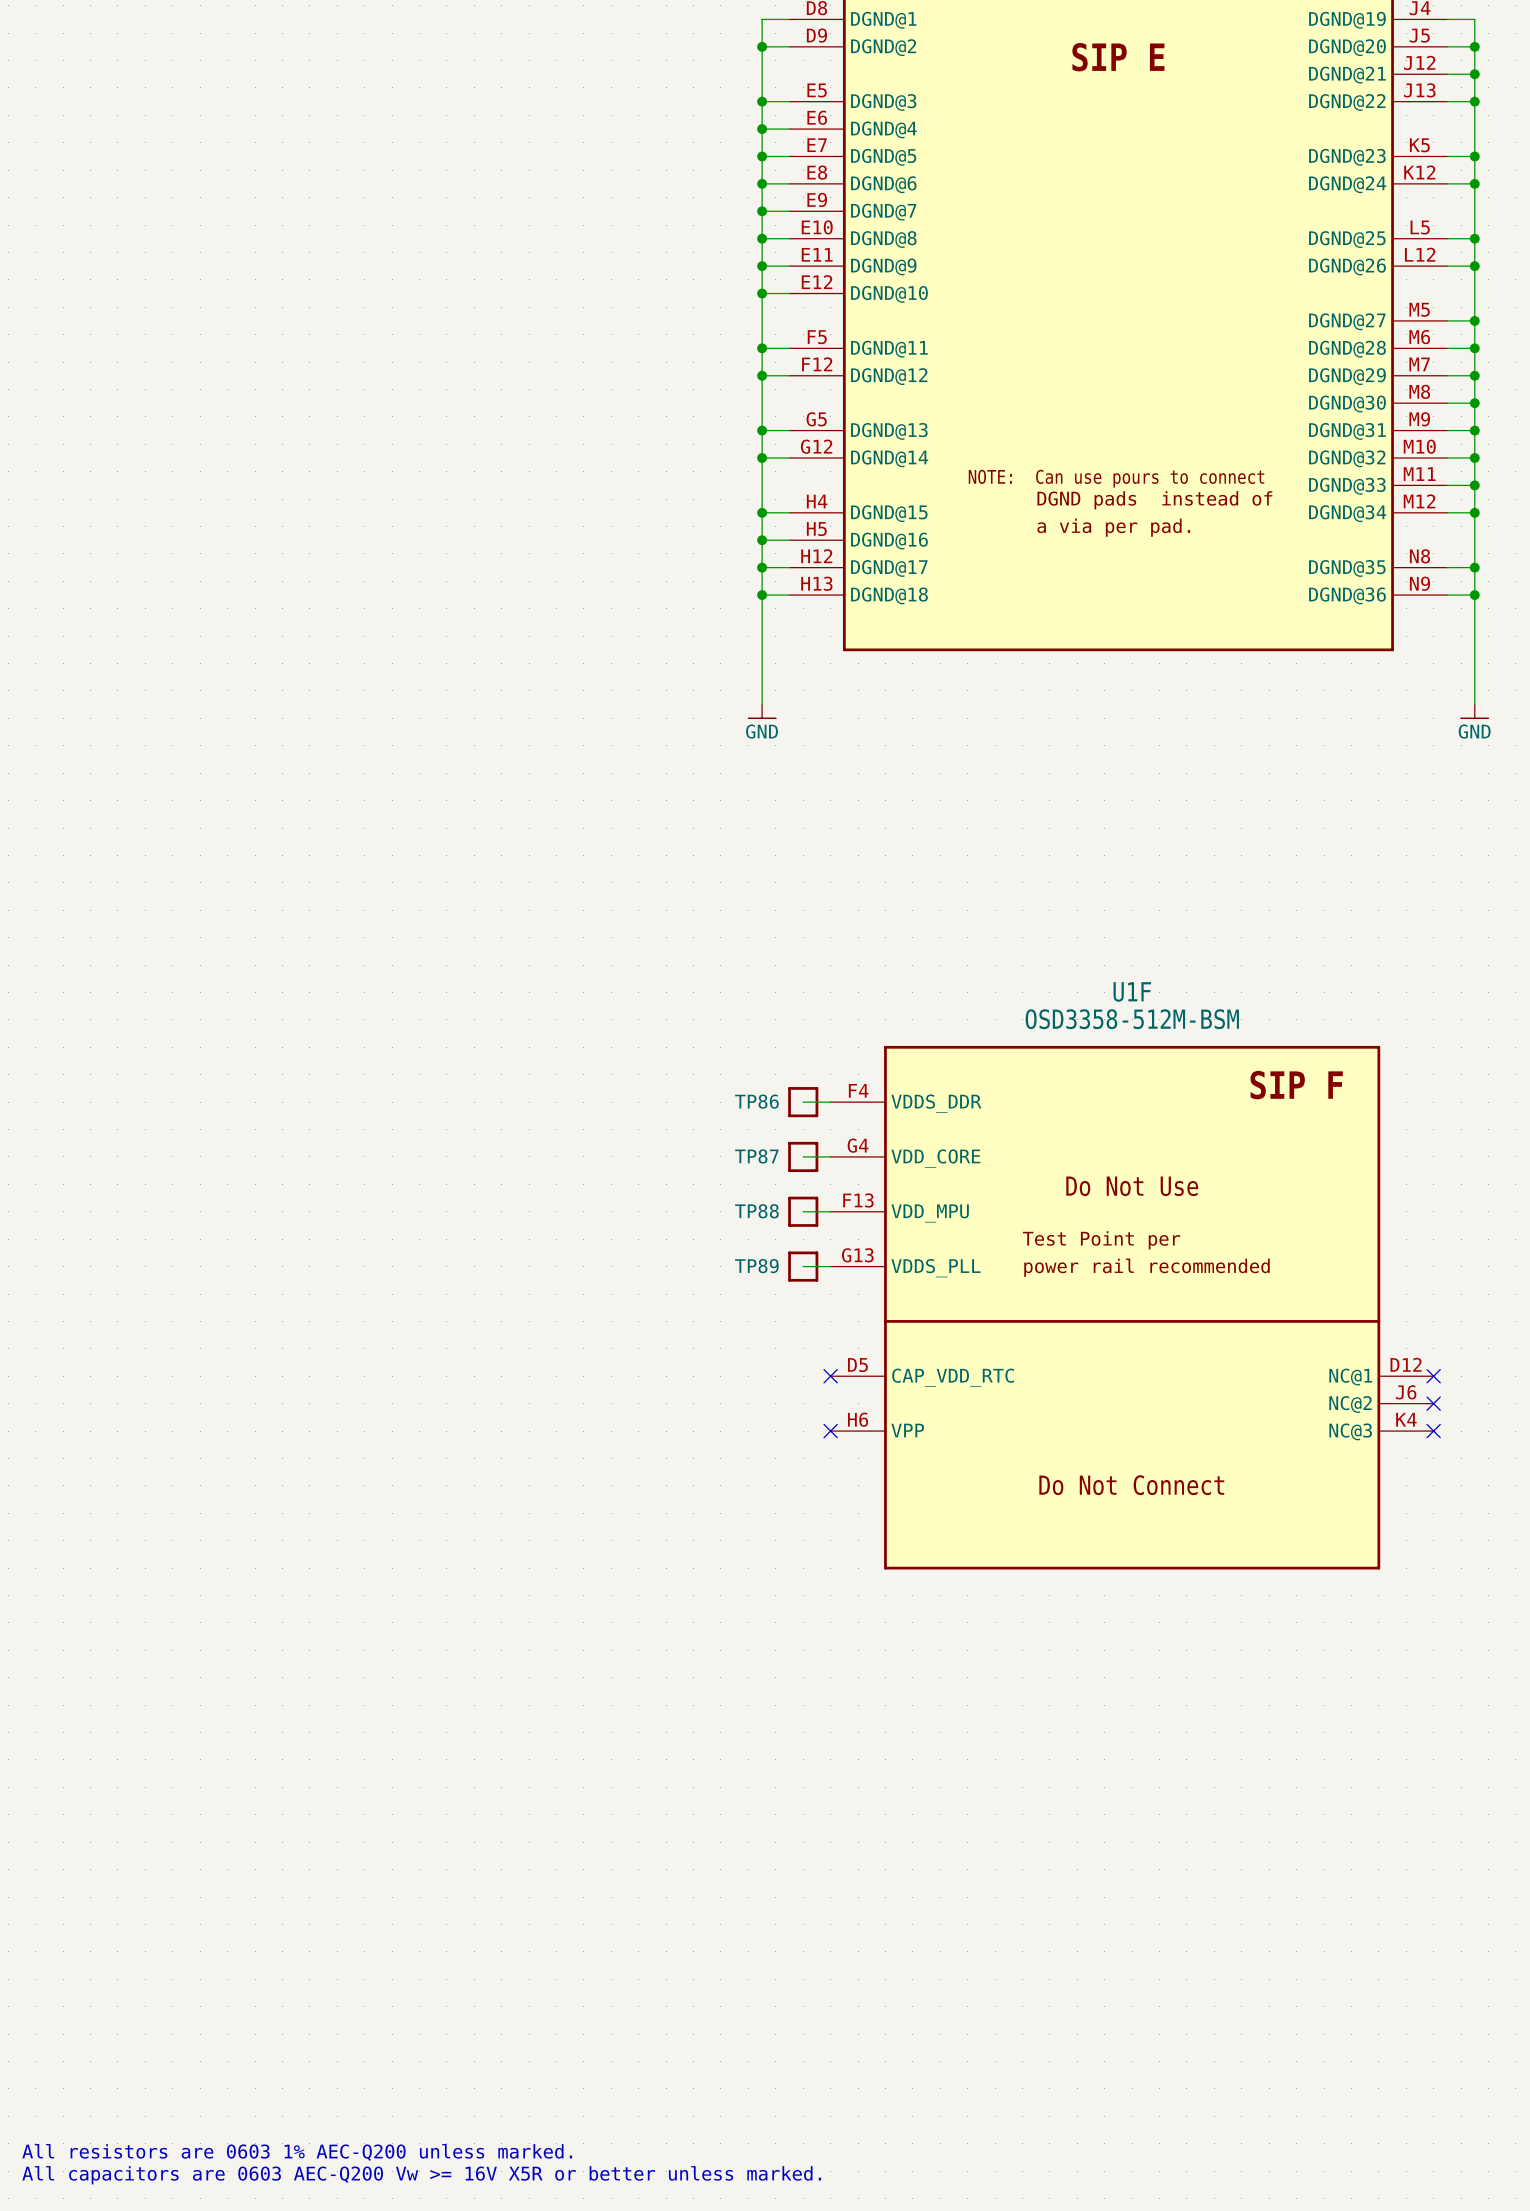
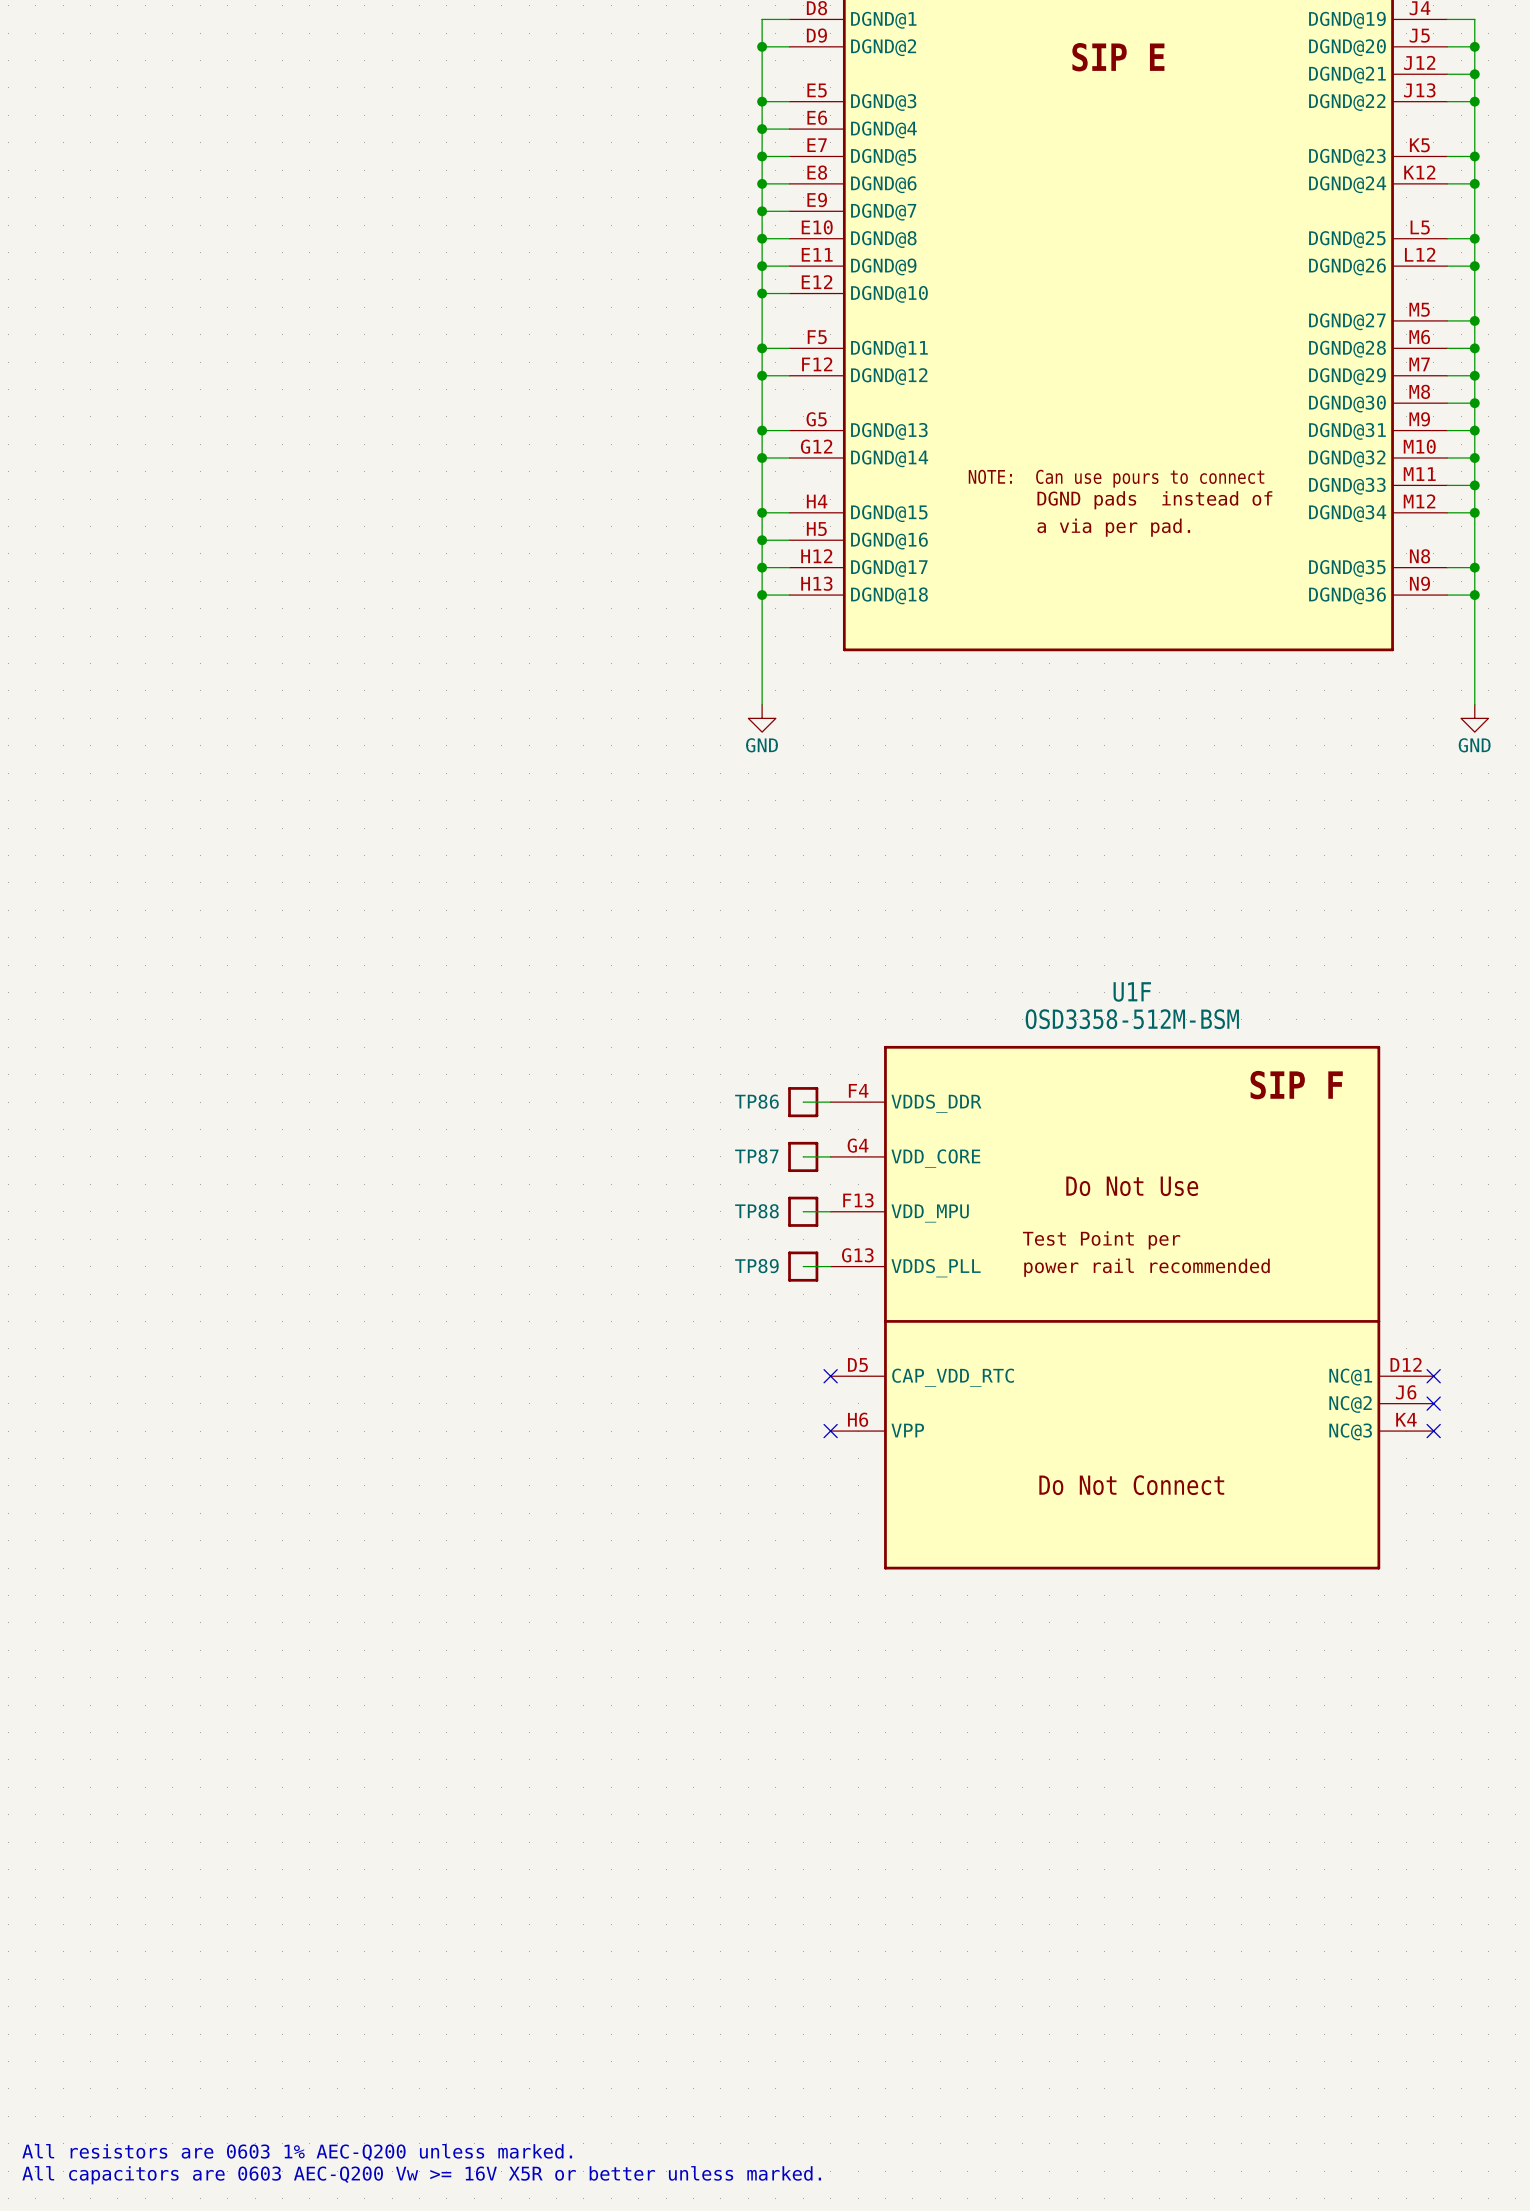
power symbol shape: [748, 704, 776, 719] -> [748, 704, 776, 733]
power symbol shape: [1461, 704, 1489, 719] -> [1461, 704, 1489, 733]

